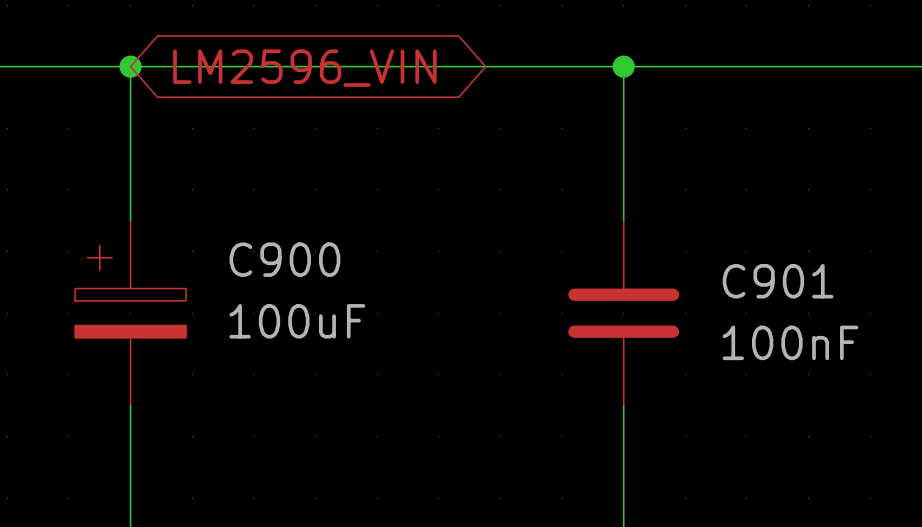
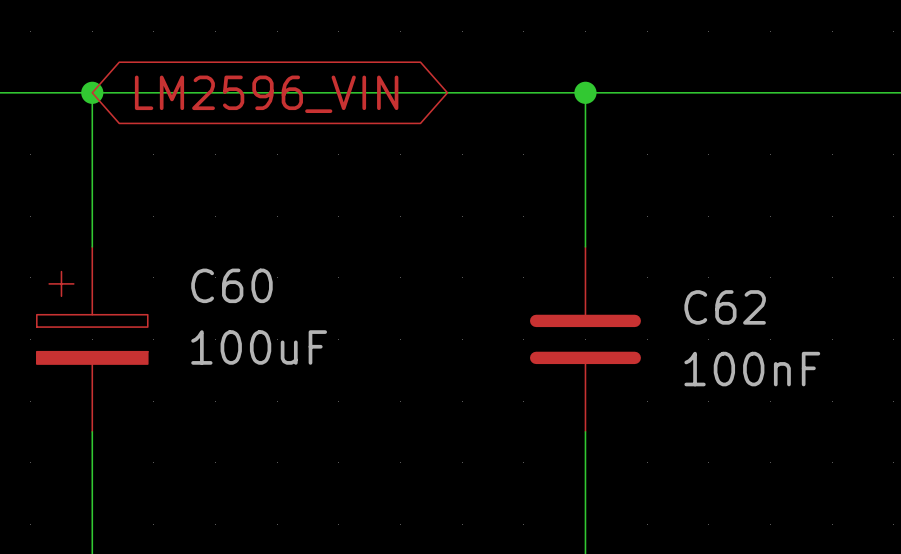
C900 name: C900 (284, 259) -> C60 (231, 285)
C901 name: C901 (778, 281) -> C62 (725, 307)

